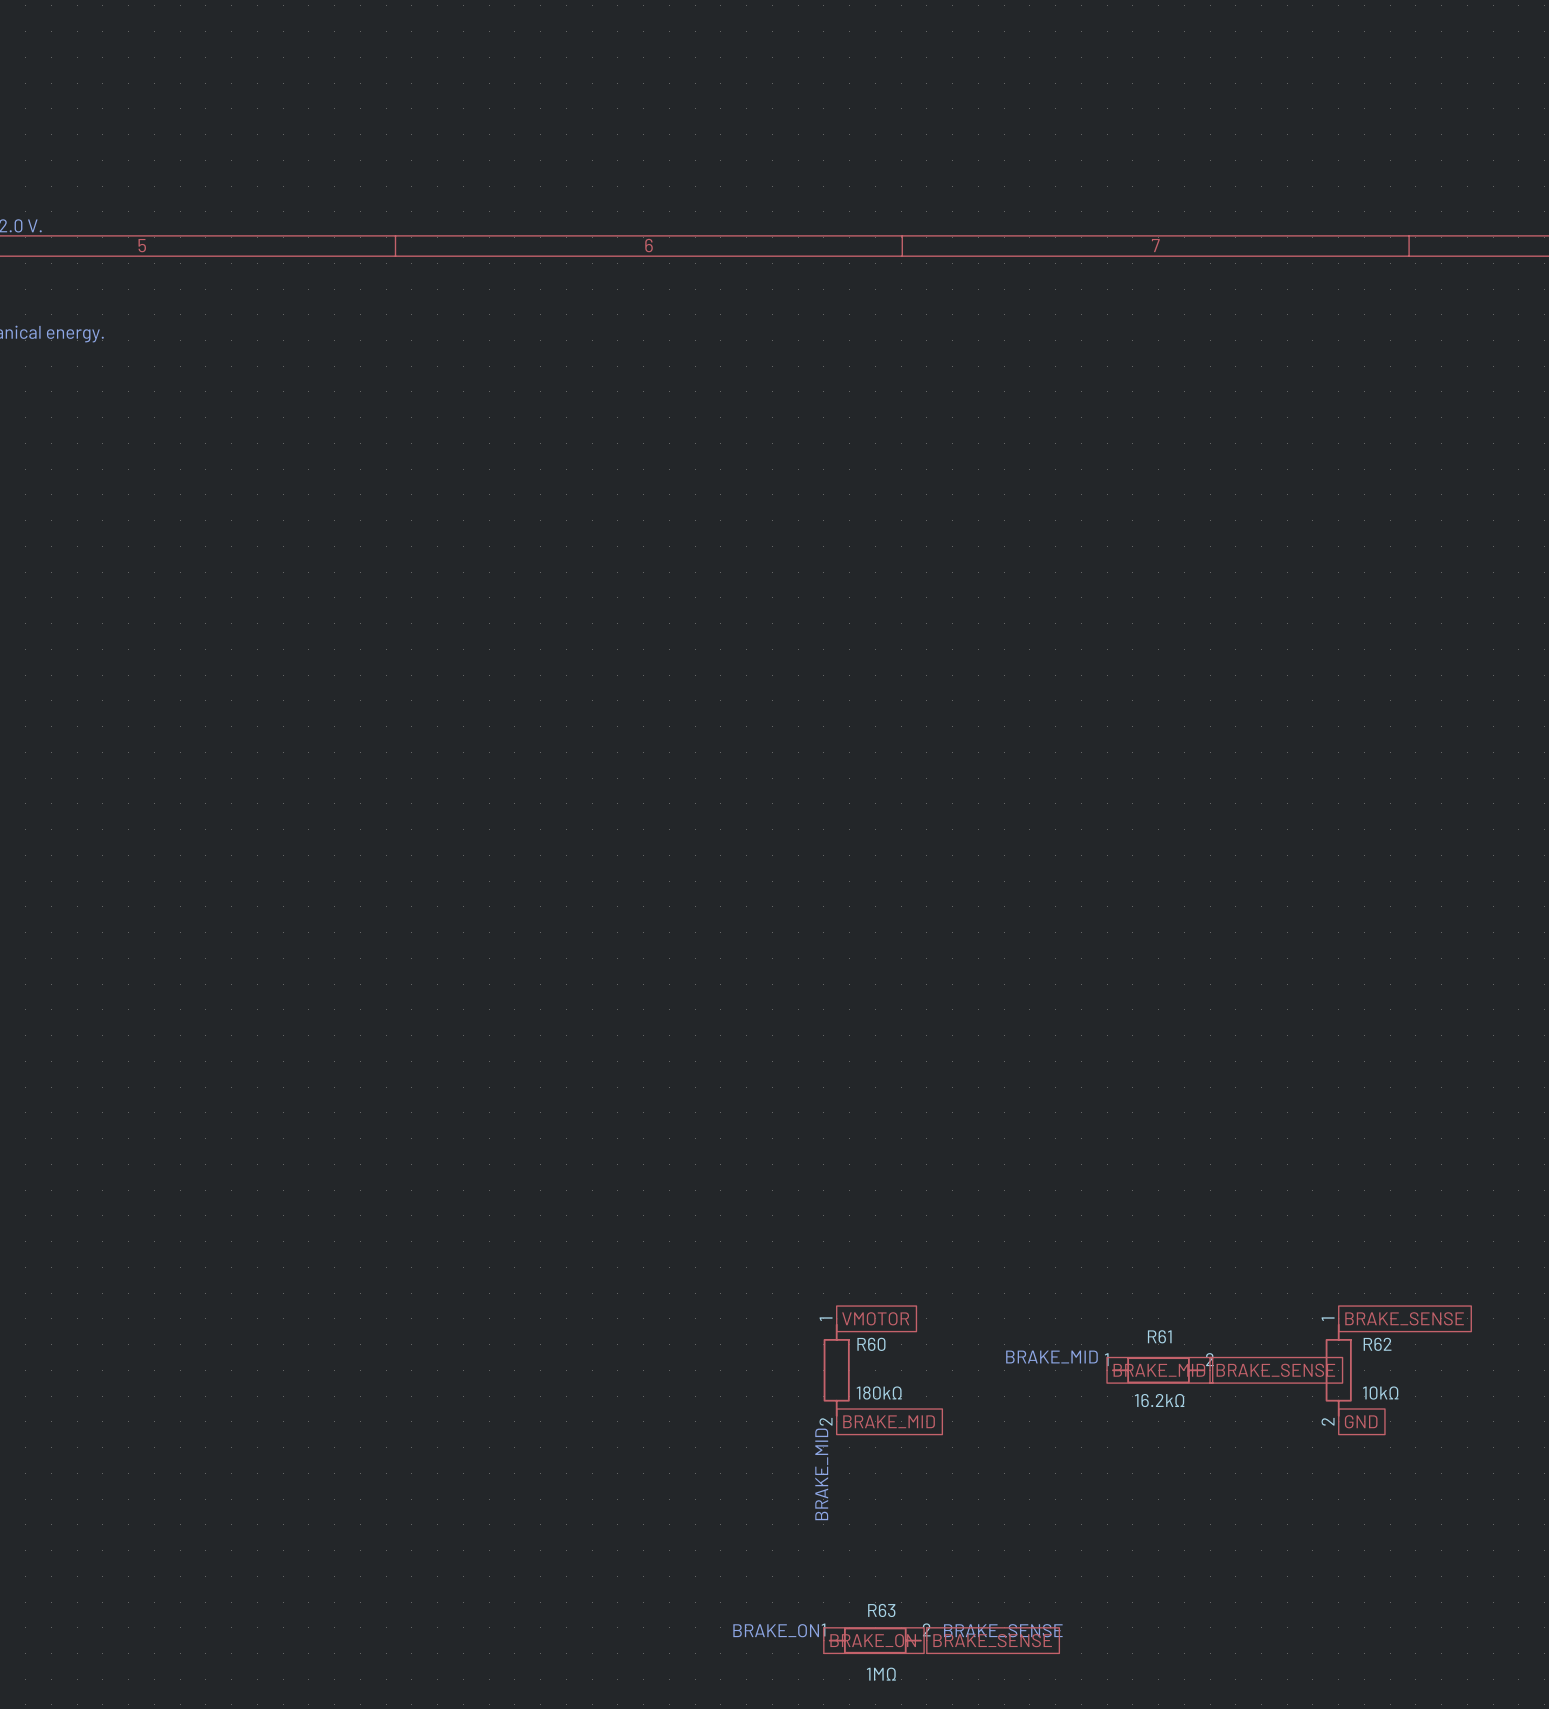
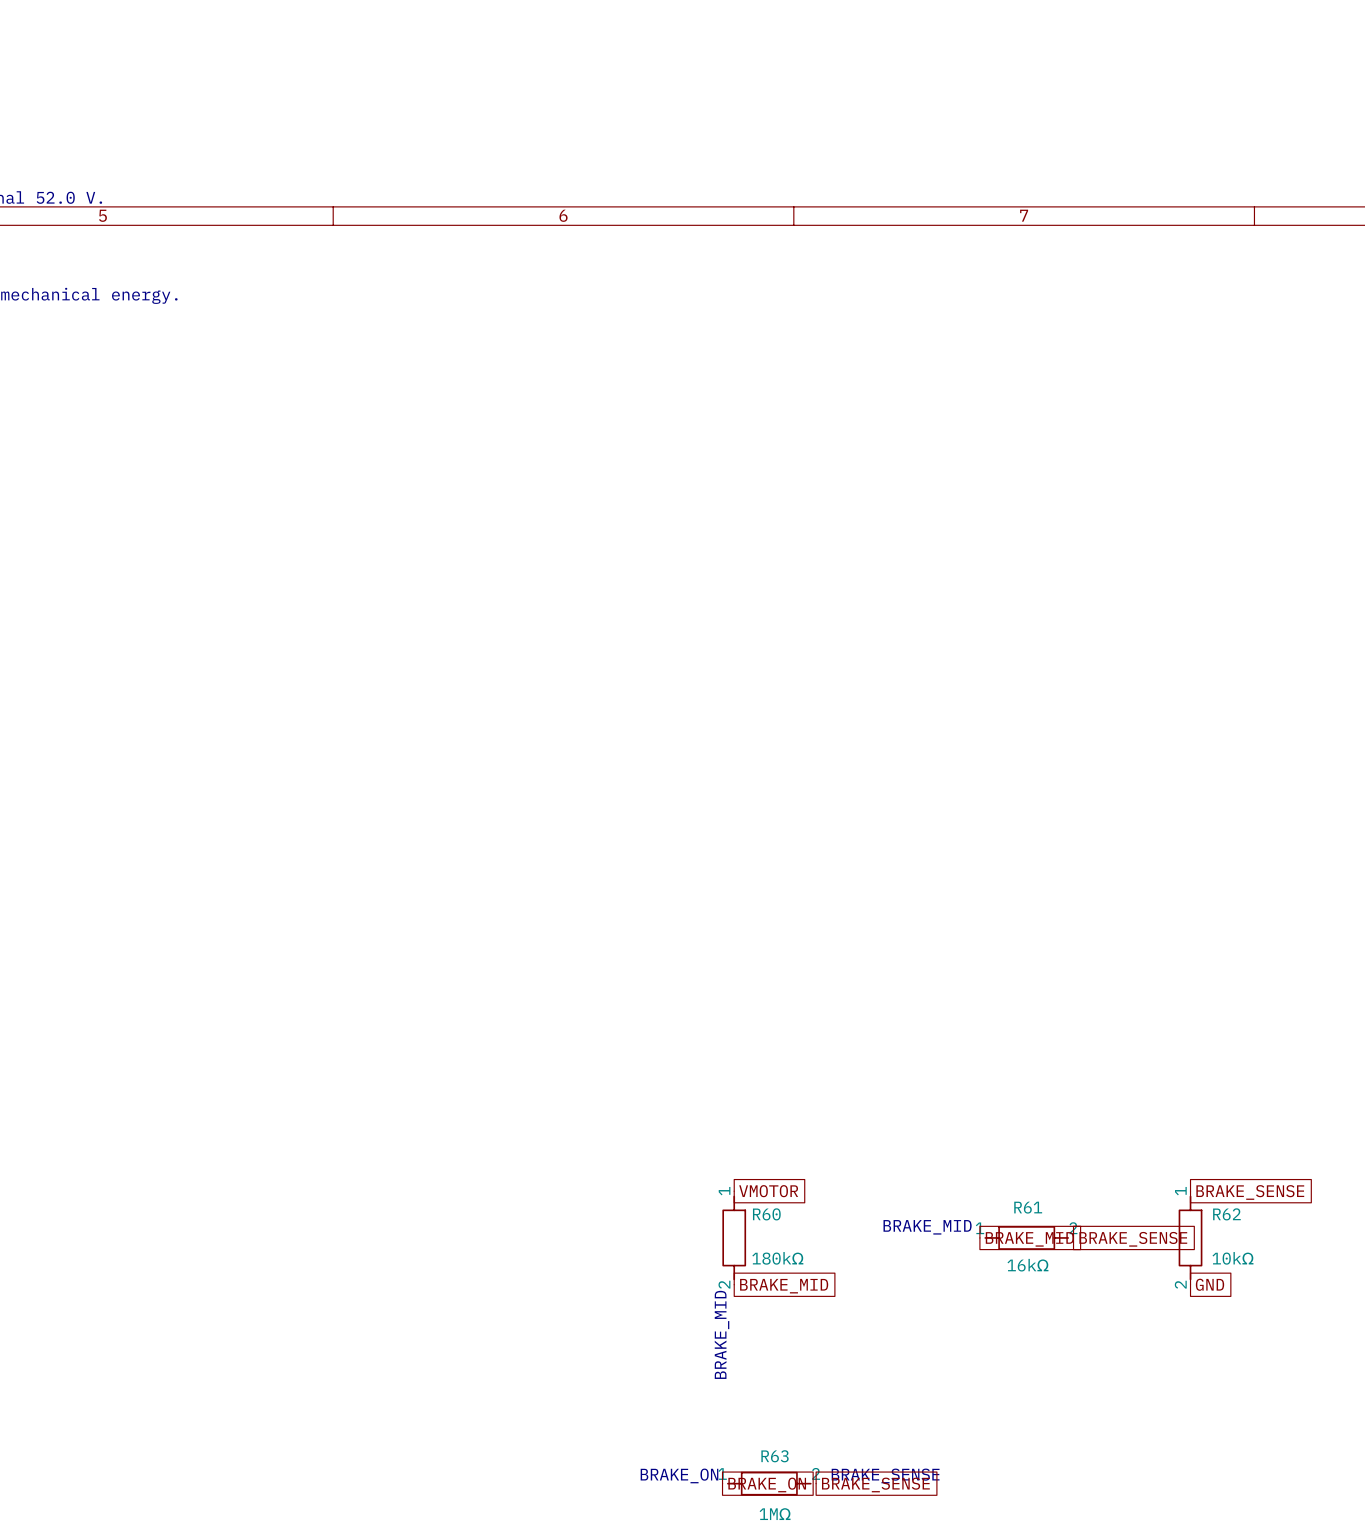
R61 value: 16.2kΩ (1159, 1400) -> 16kΩ (1027, 1265)

